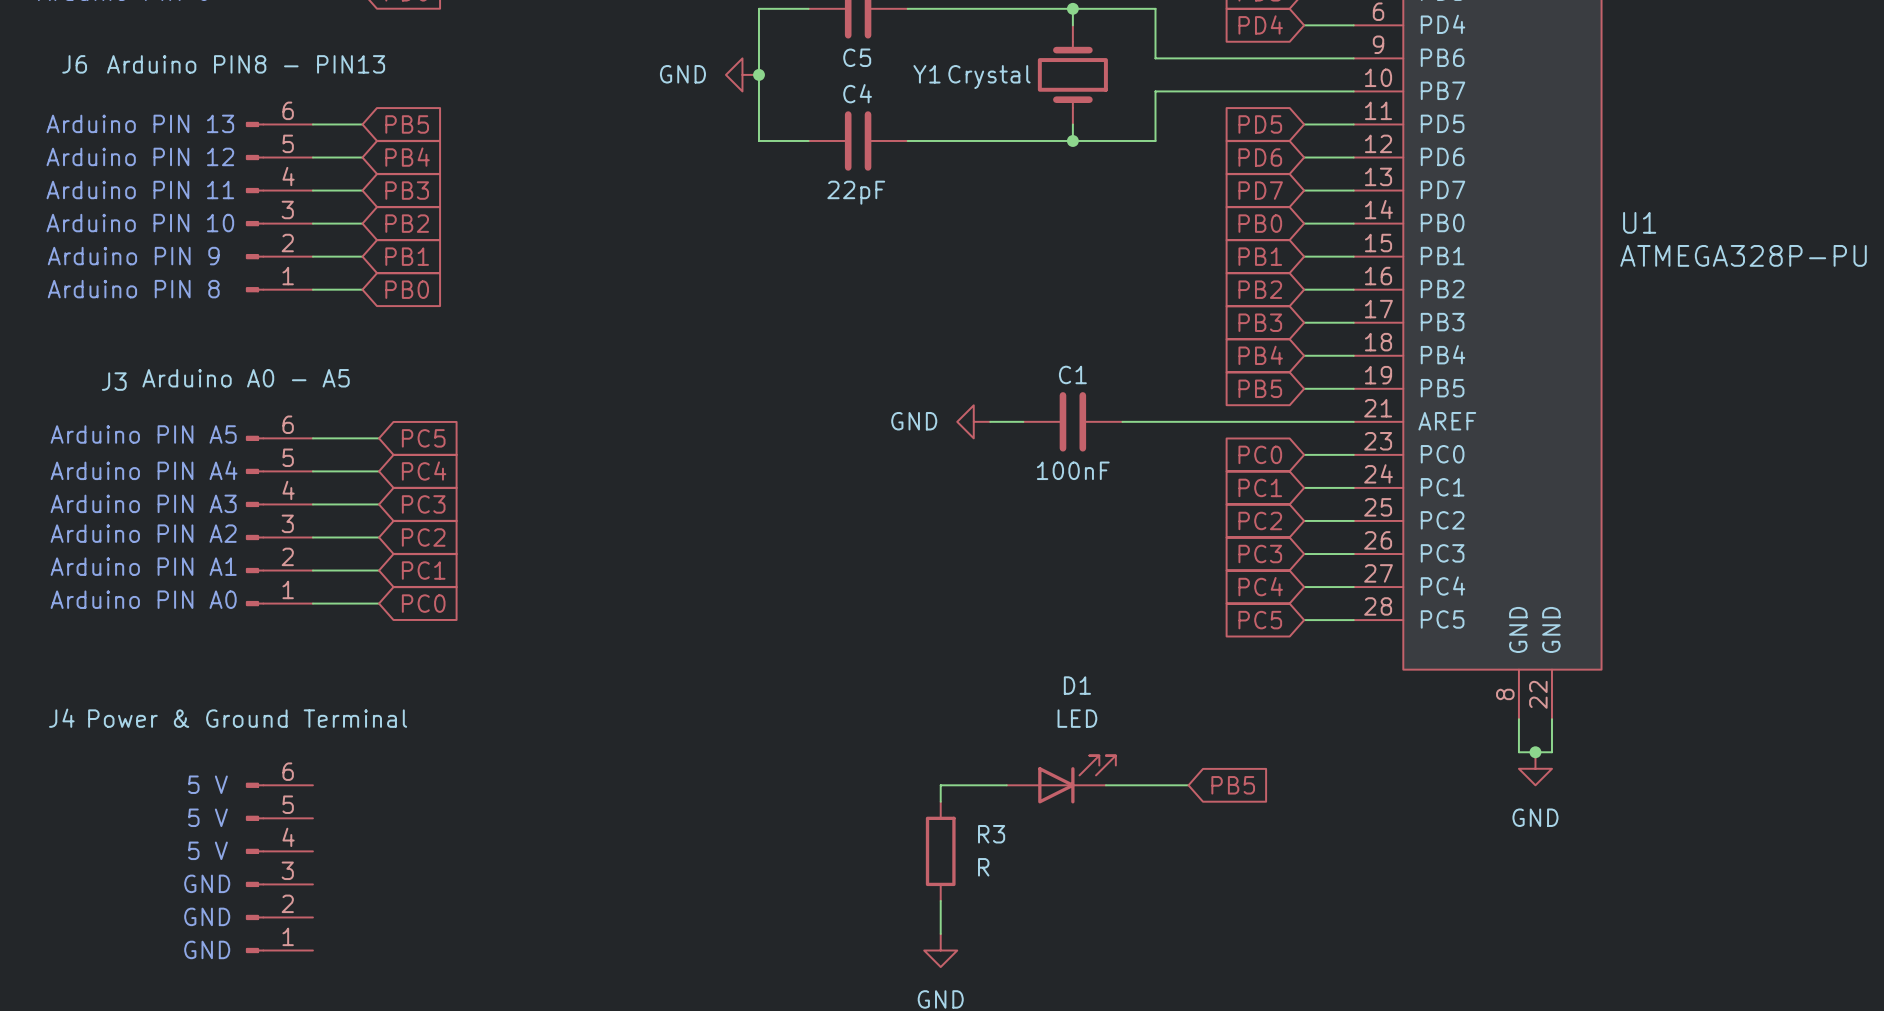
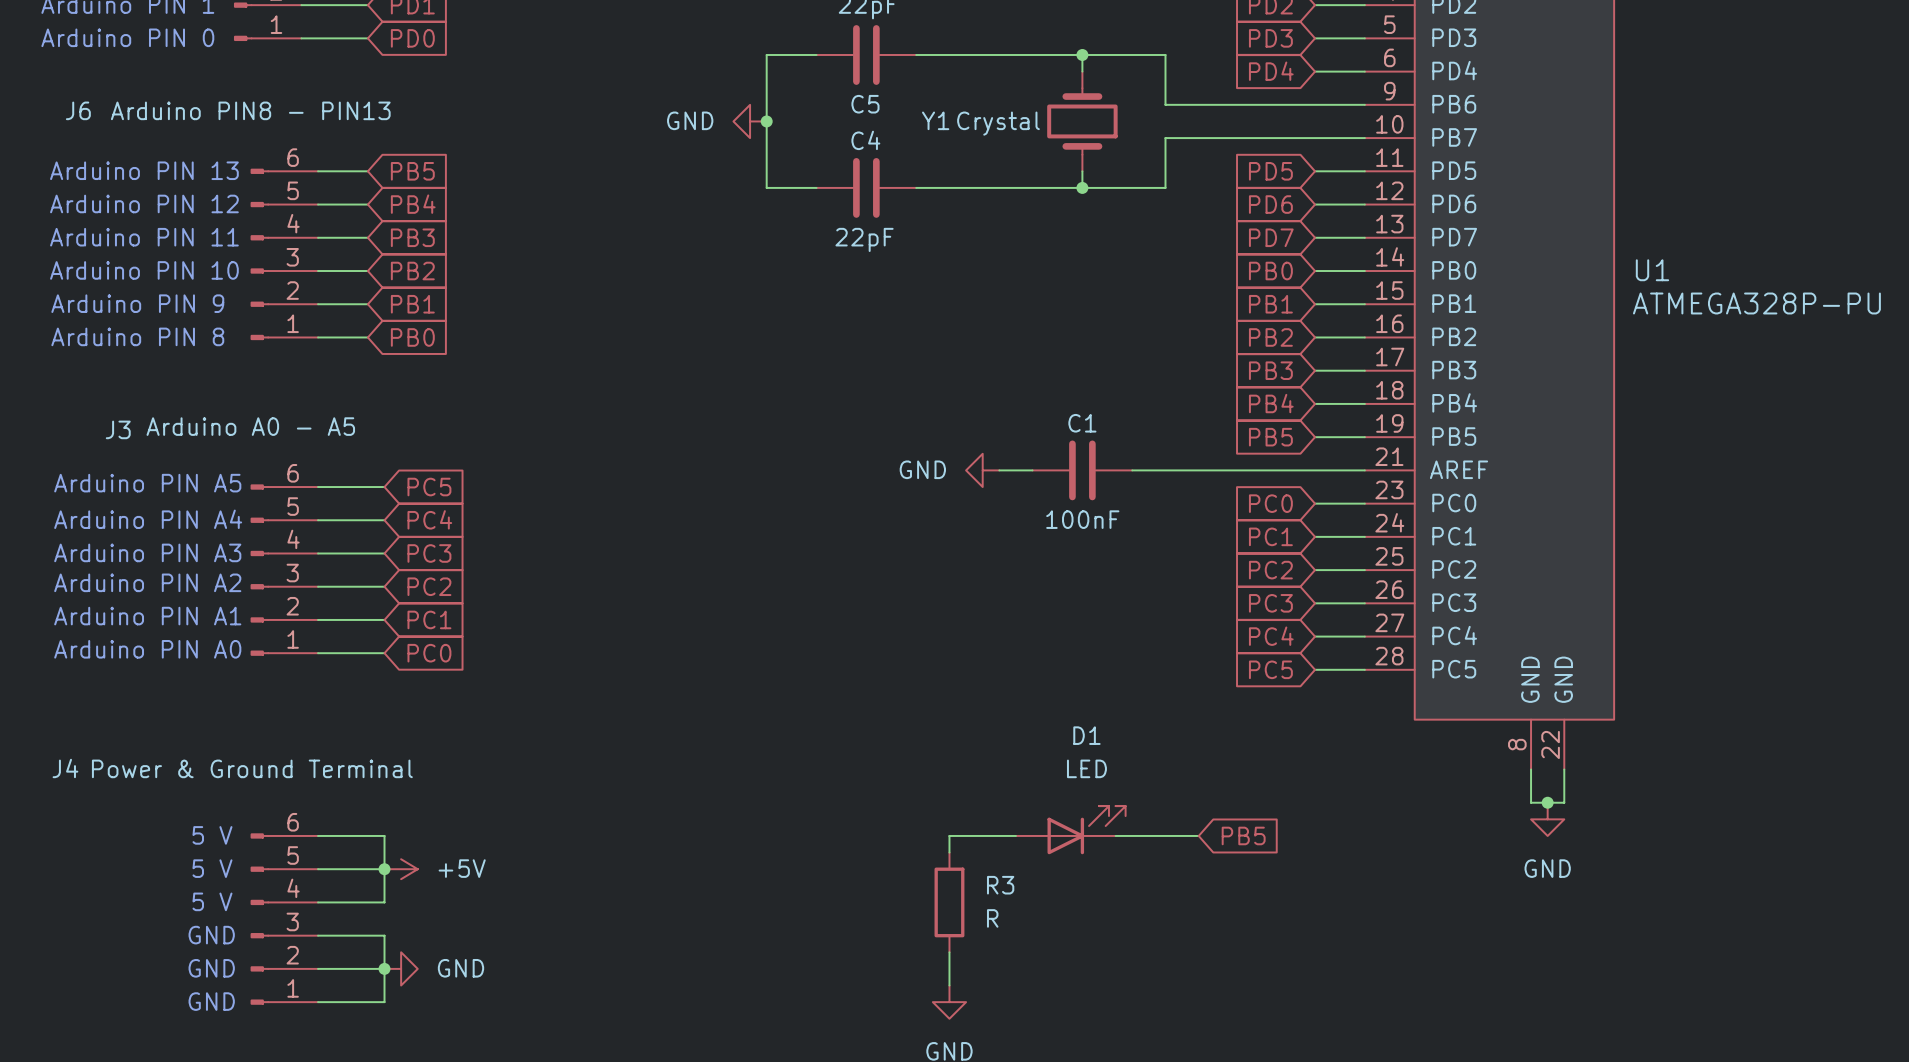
wire: none -> (318, 835) (384, 835) (384, 902) (318, 902)
wire: none -> (318, 869) (384, 869)
junction: none -> (384, 869)
power symbol: none -> +5V (401, 869)
wire: none -> (318, 935) (384, 935) (384, 1002) (318, 1002)
wire: none -> (318, 968) (384, 968)
junction: none -> (384, 968)
power symbol: none -> GND (401, 968)

